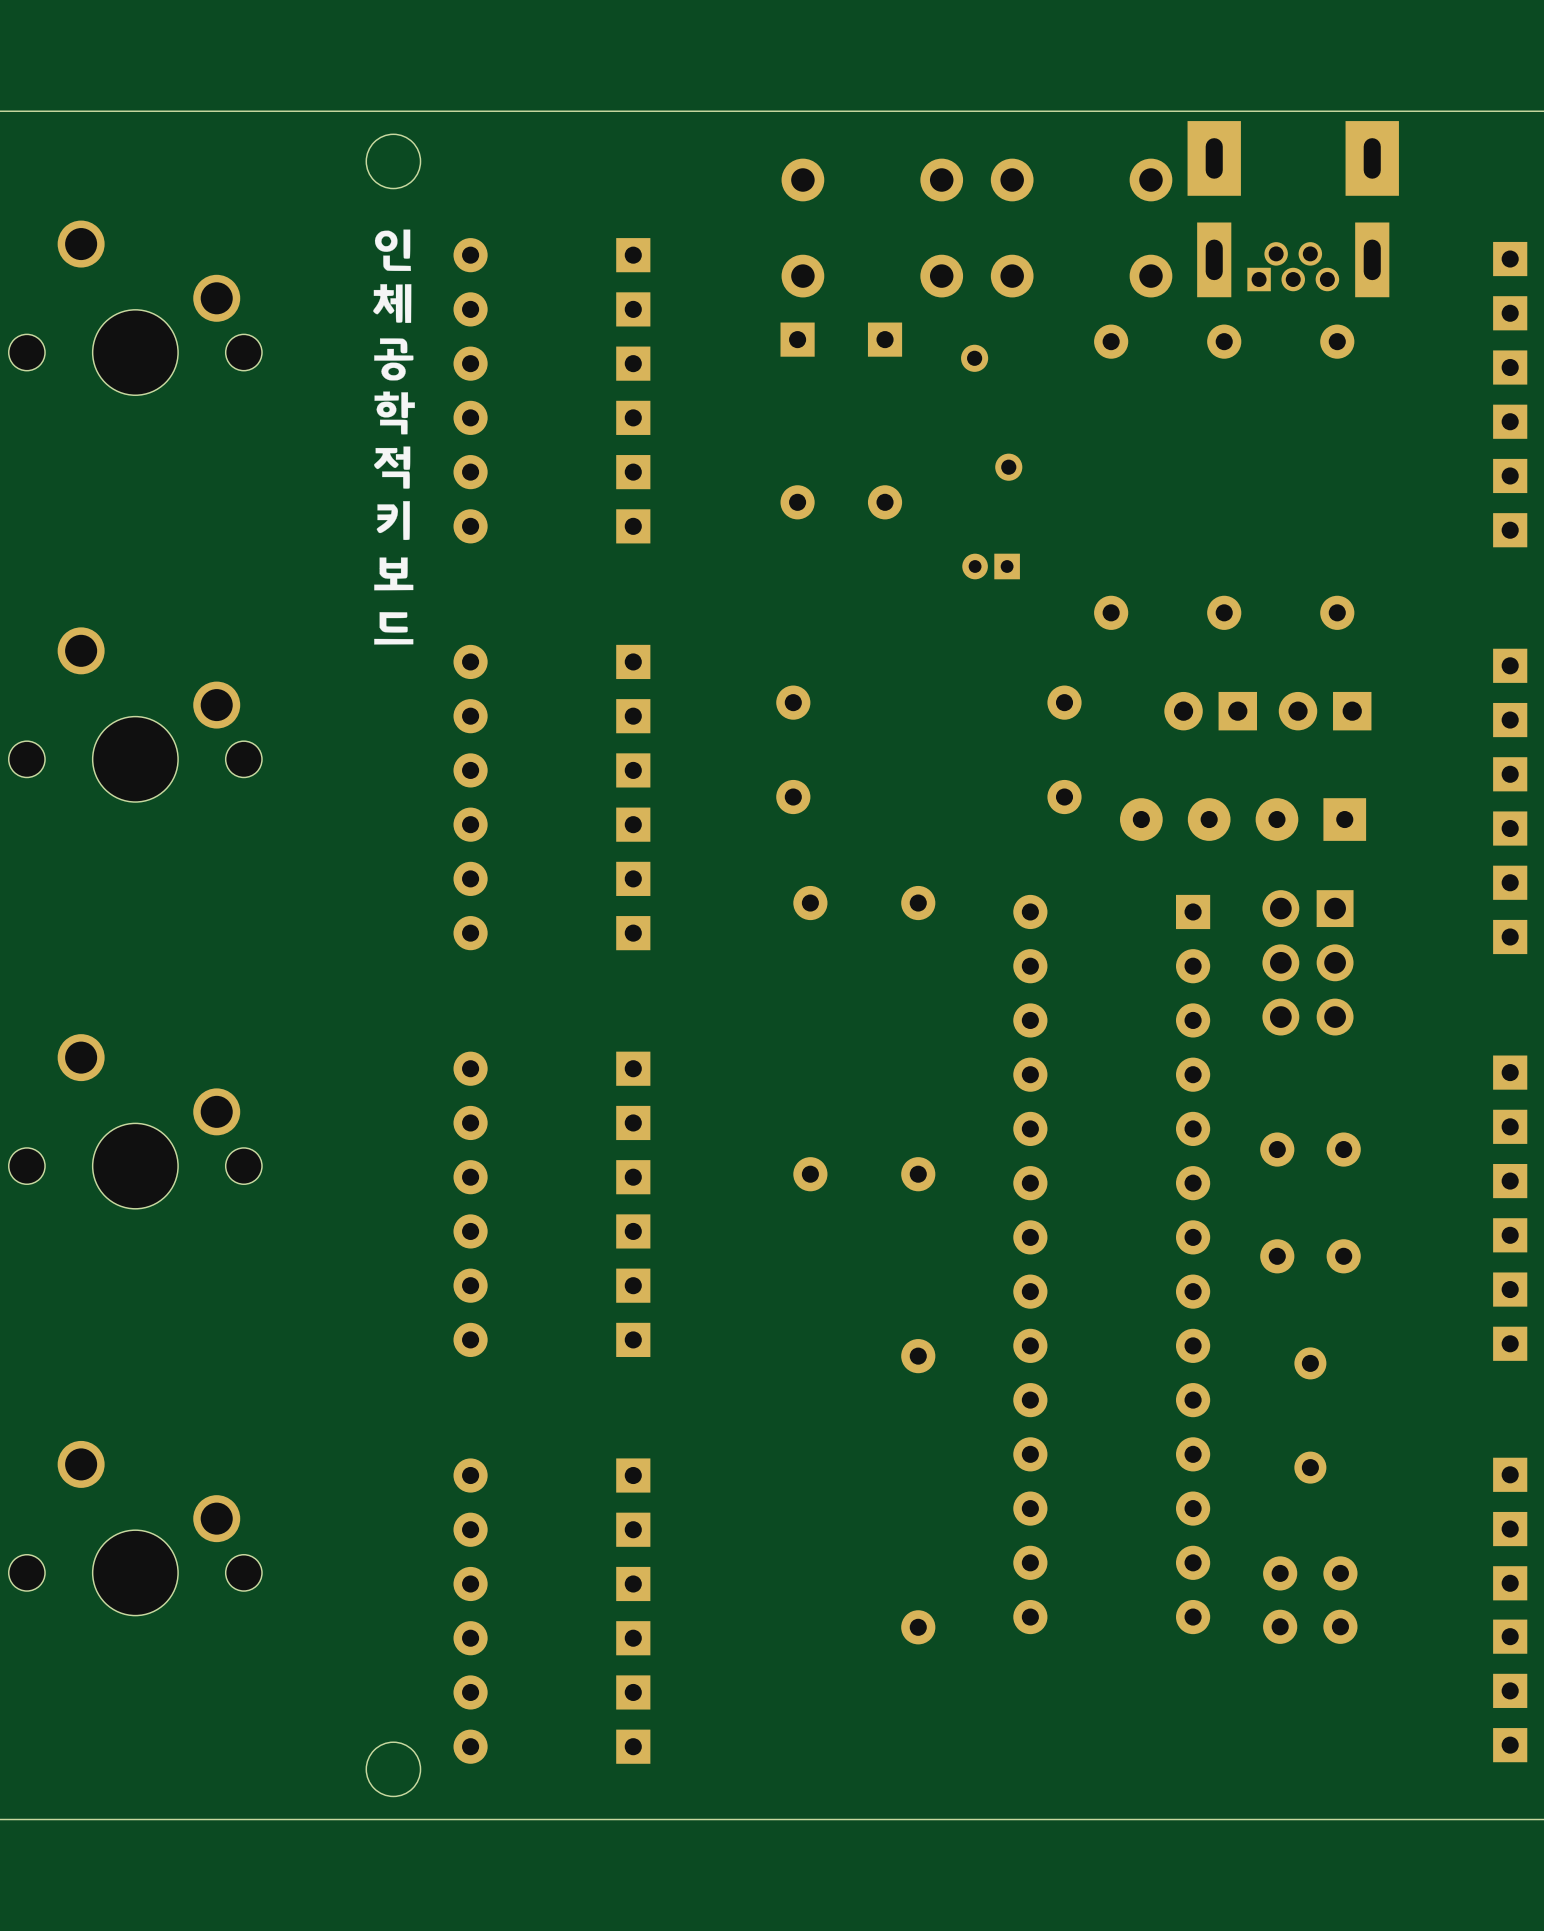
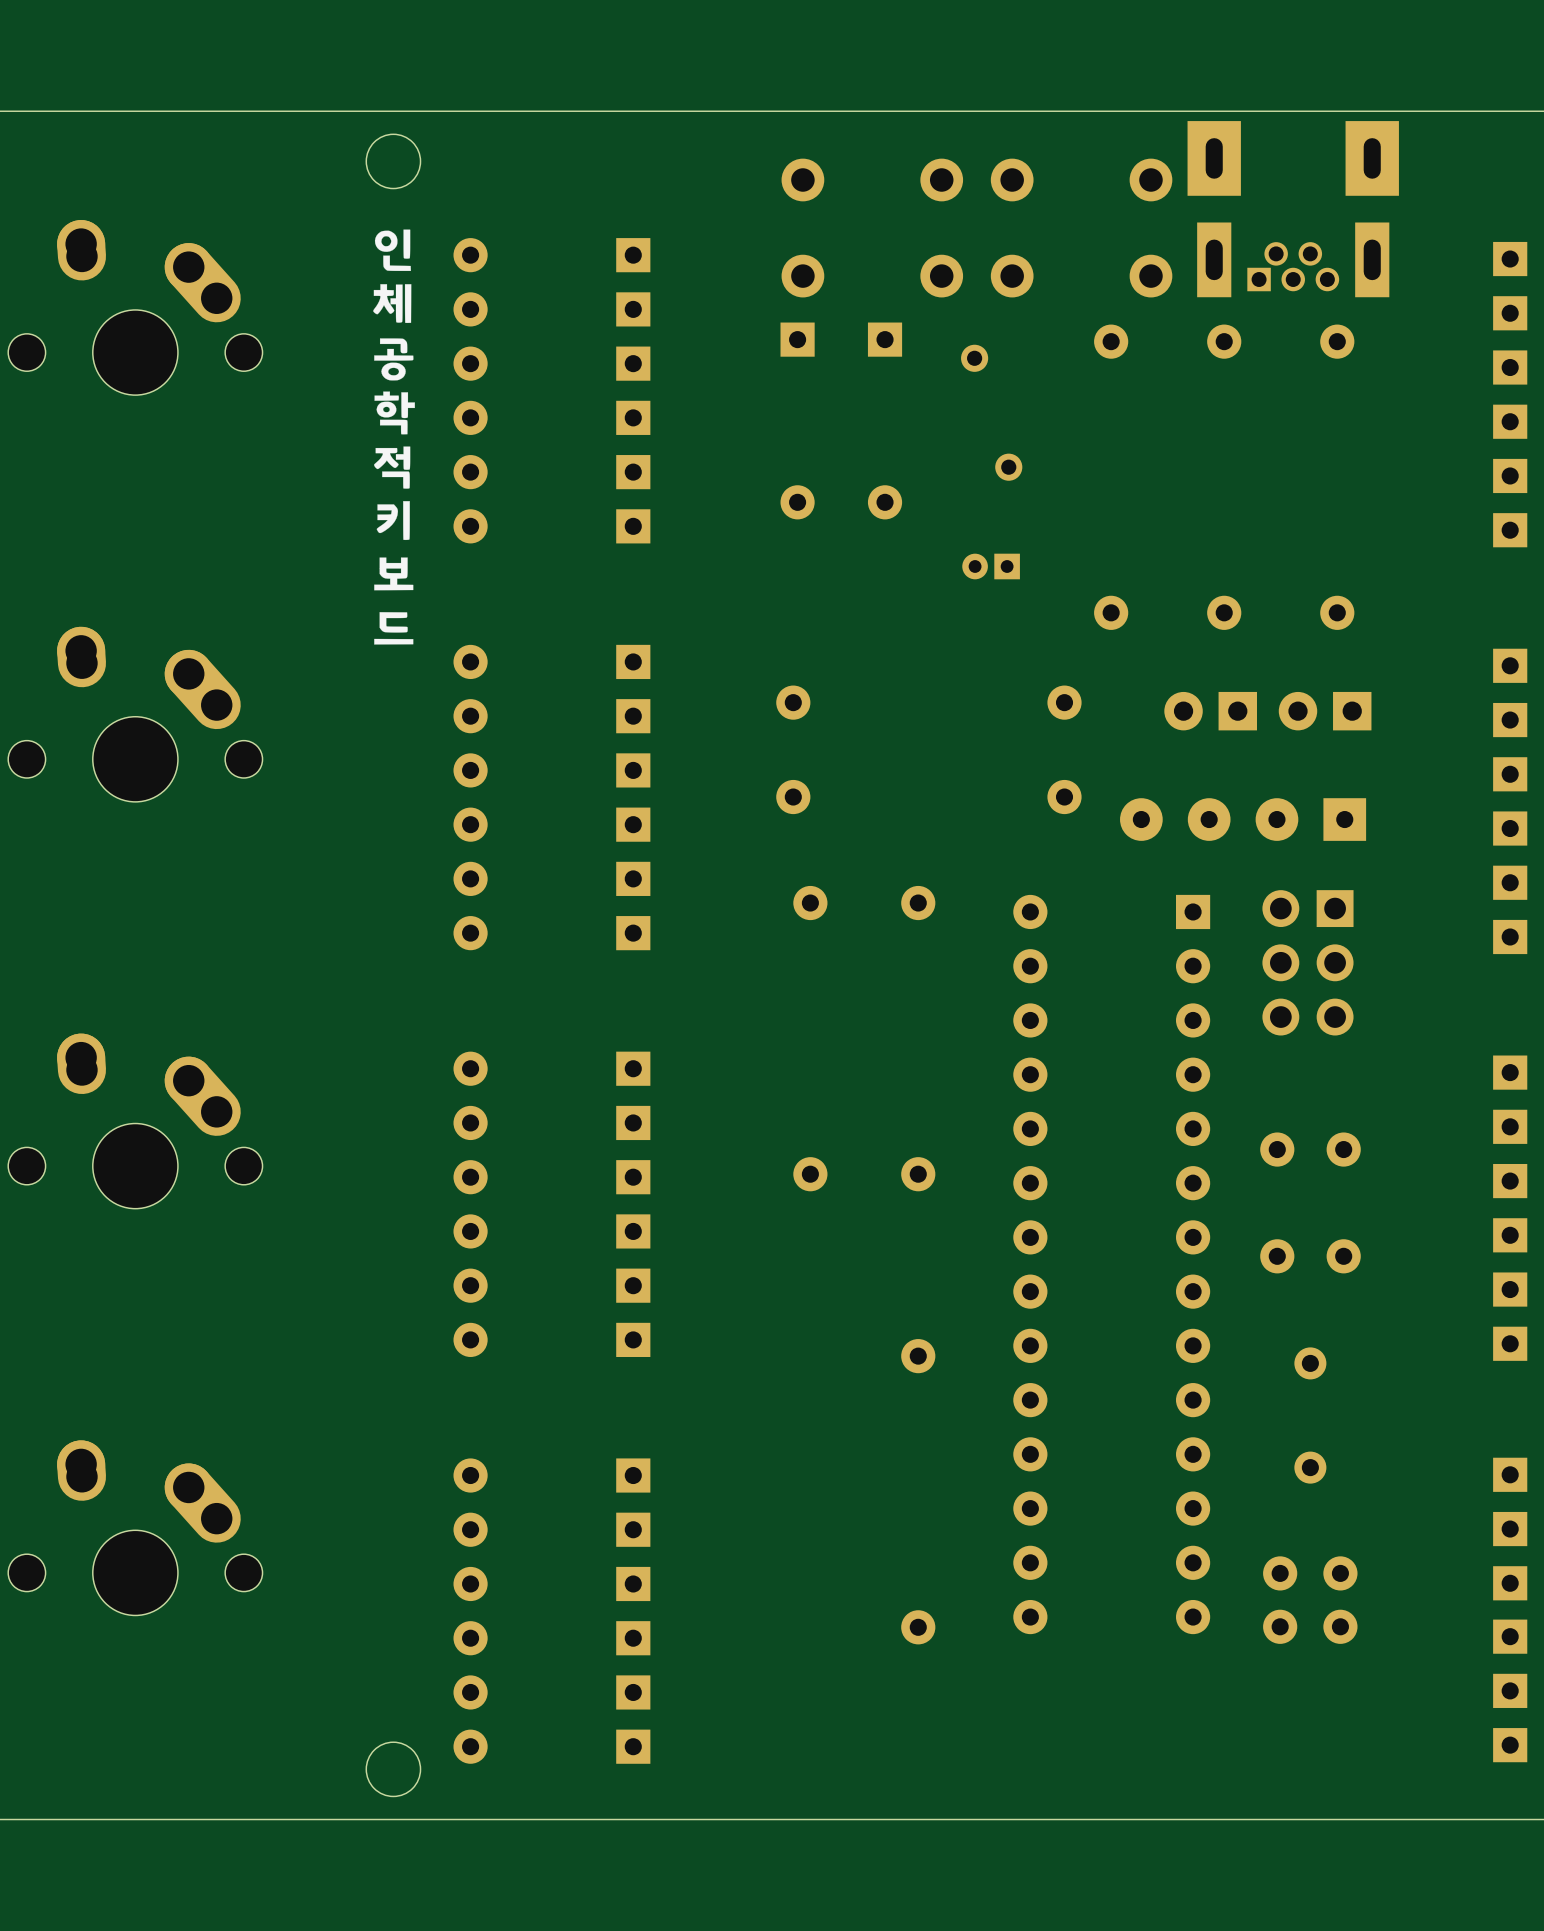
part footprint: [8, 220, 262, 396] -> [8, 220, 263, 396]
part footprint: [8, 627, 262, 803] -> [8, 626, 263, 802]
part footprint: [8, 1034, 262, 1209] -> [8, 1033, 263, 1209]
part footprint: [8, 1440, 262, 1616] -> [8, 1440, 263, 1616]

